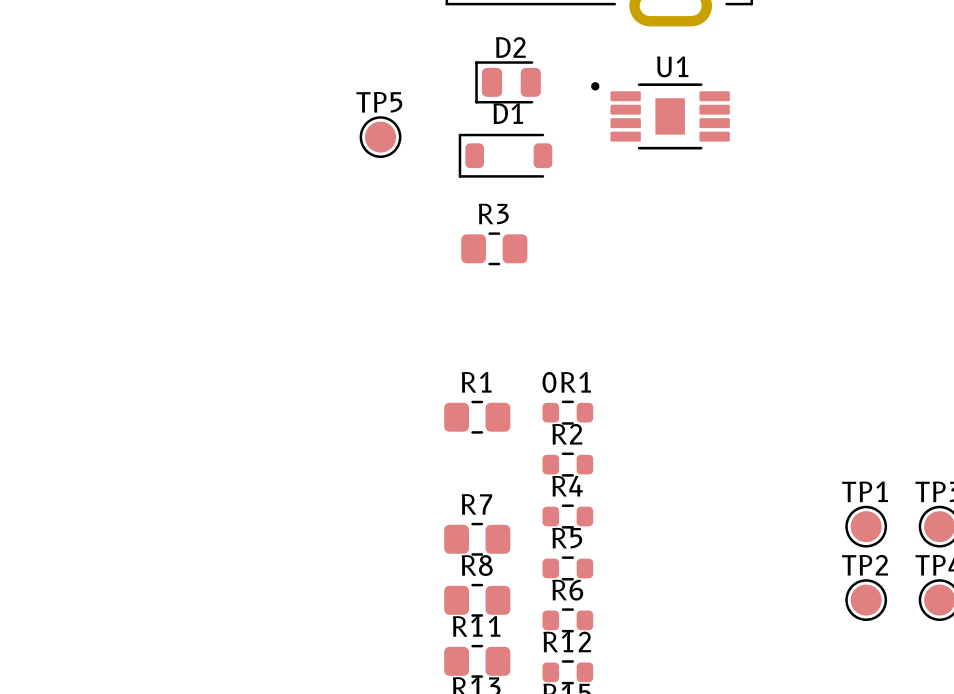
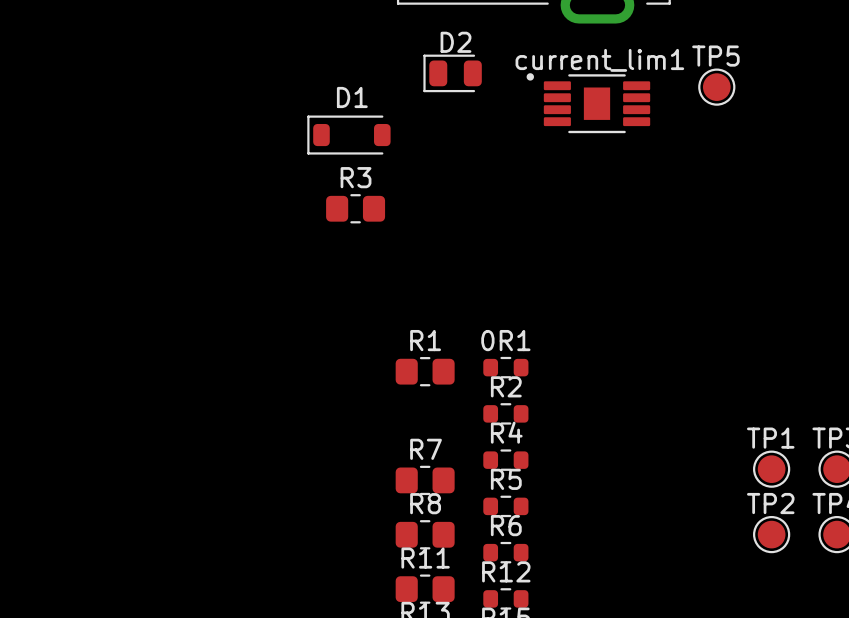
U1 name: U1 (672, 66) -> current_lim1 (599, 60)
TP5 position: (380, 137) -> (716, 87)
D1 position: (505, 155) -> (348, 135)
R3 position: (494, 248) -> (355, 208)

